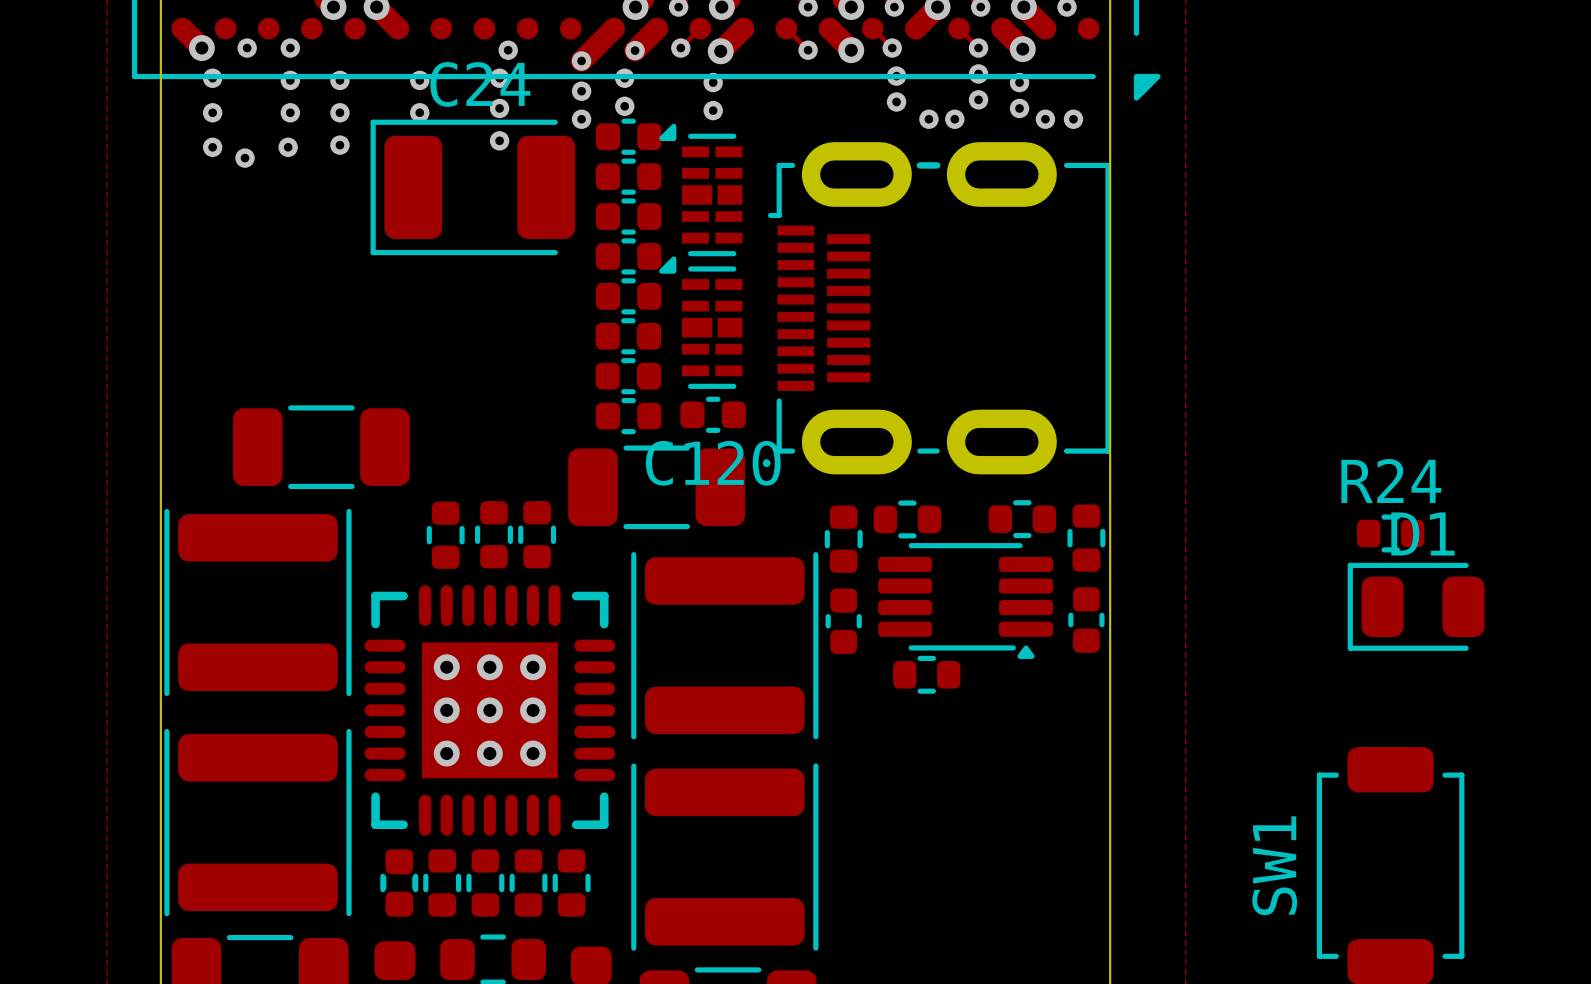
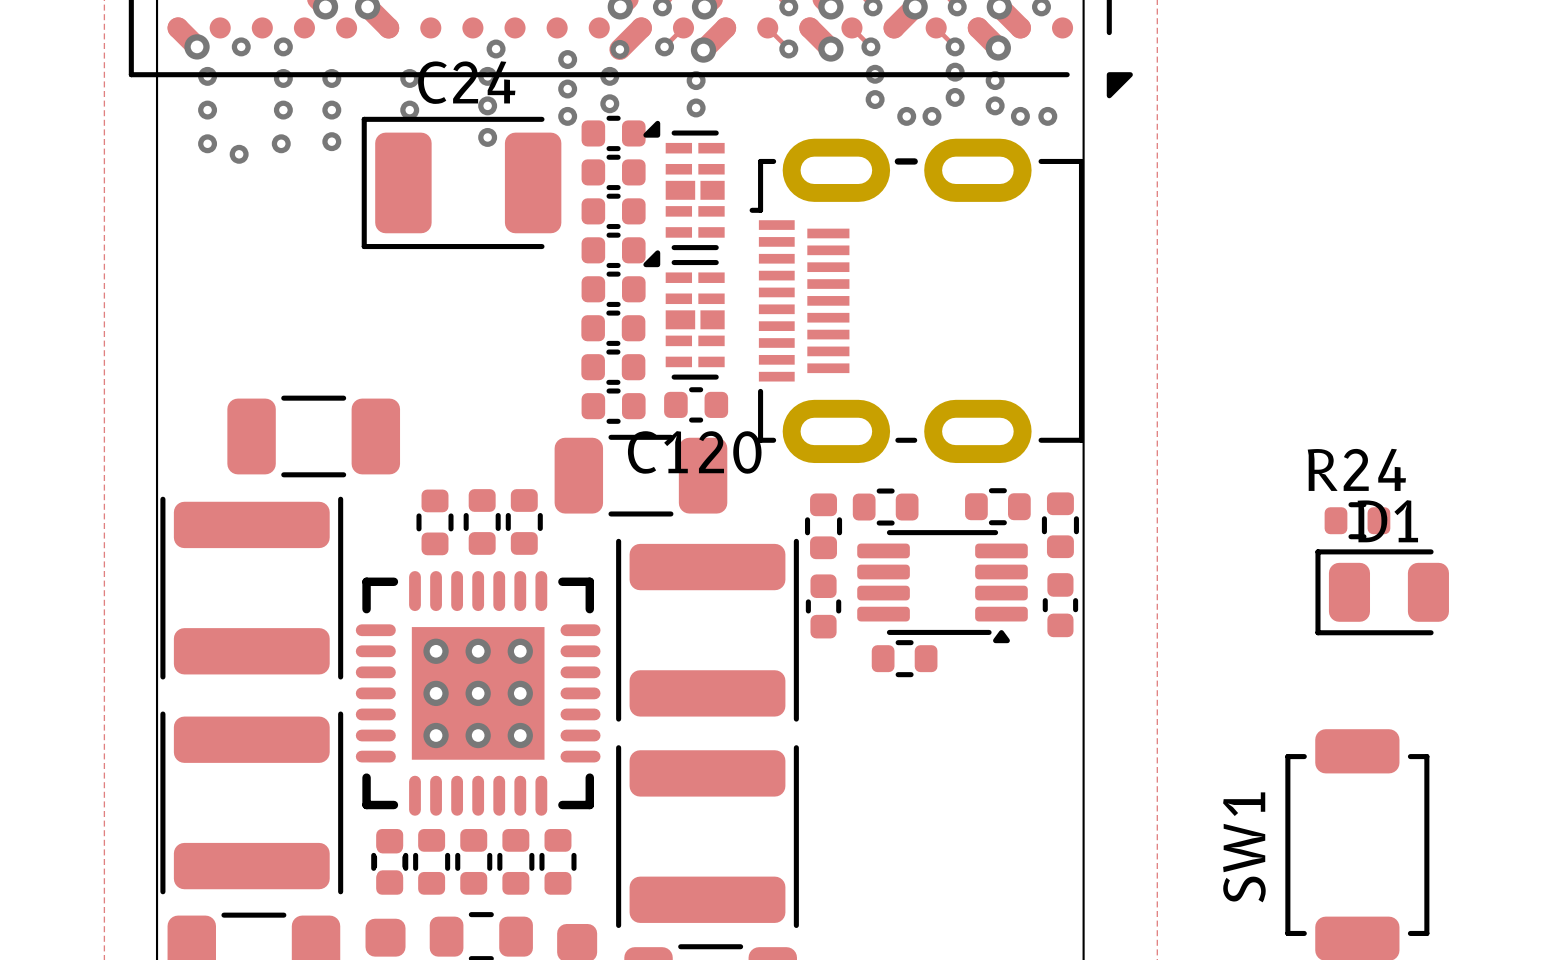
track: (613, 28) (581, 60) -> none

